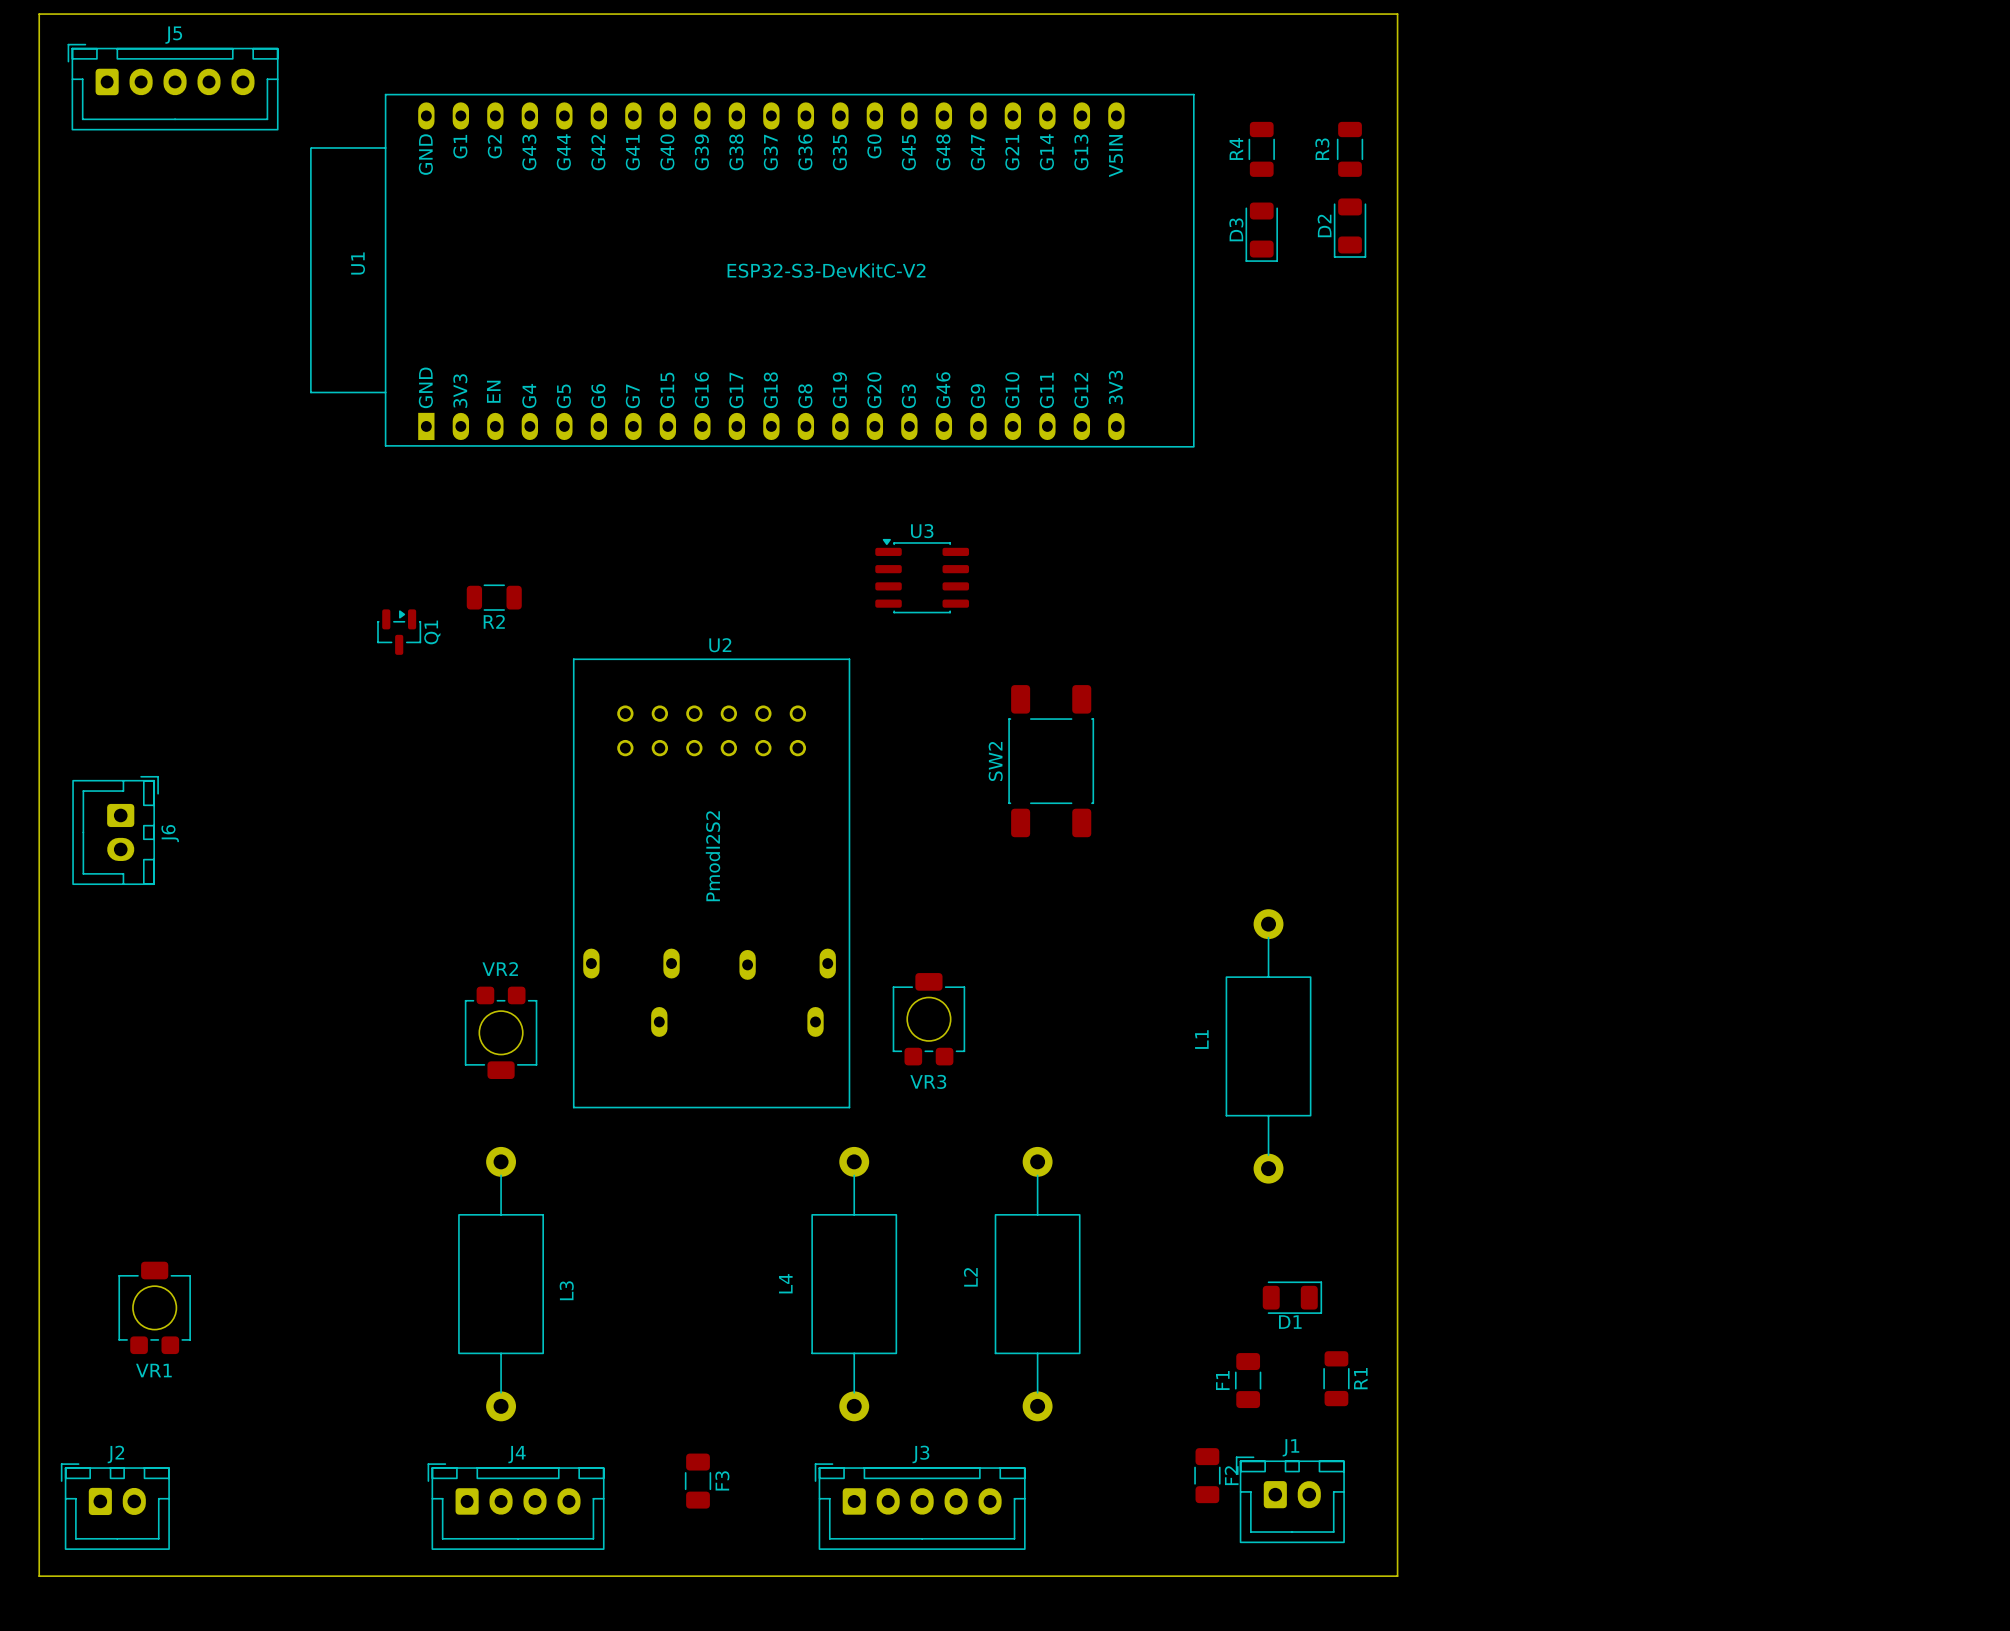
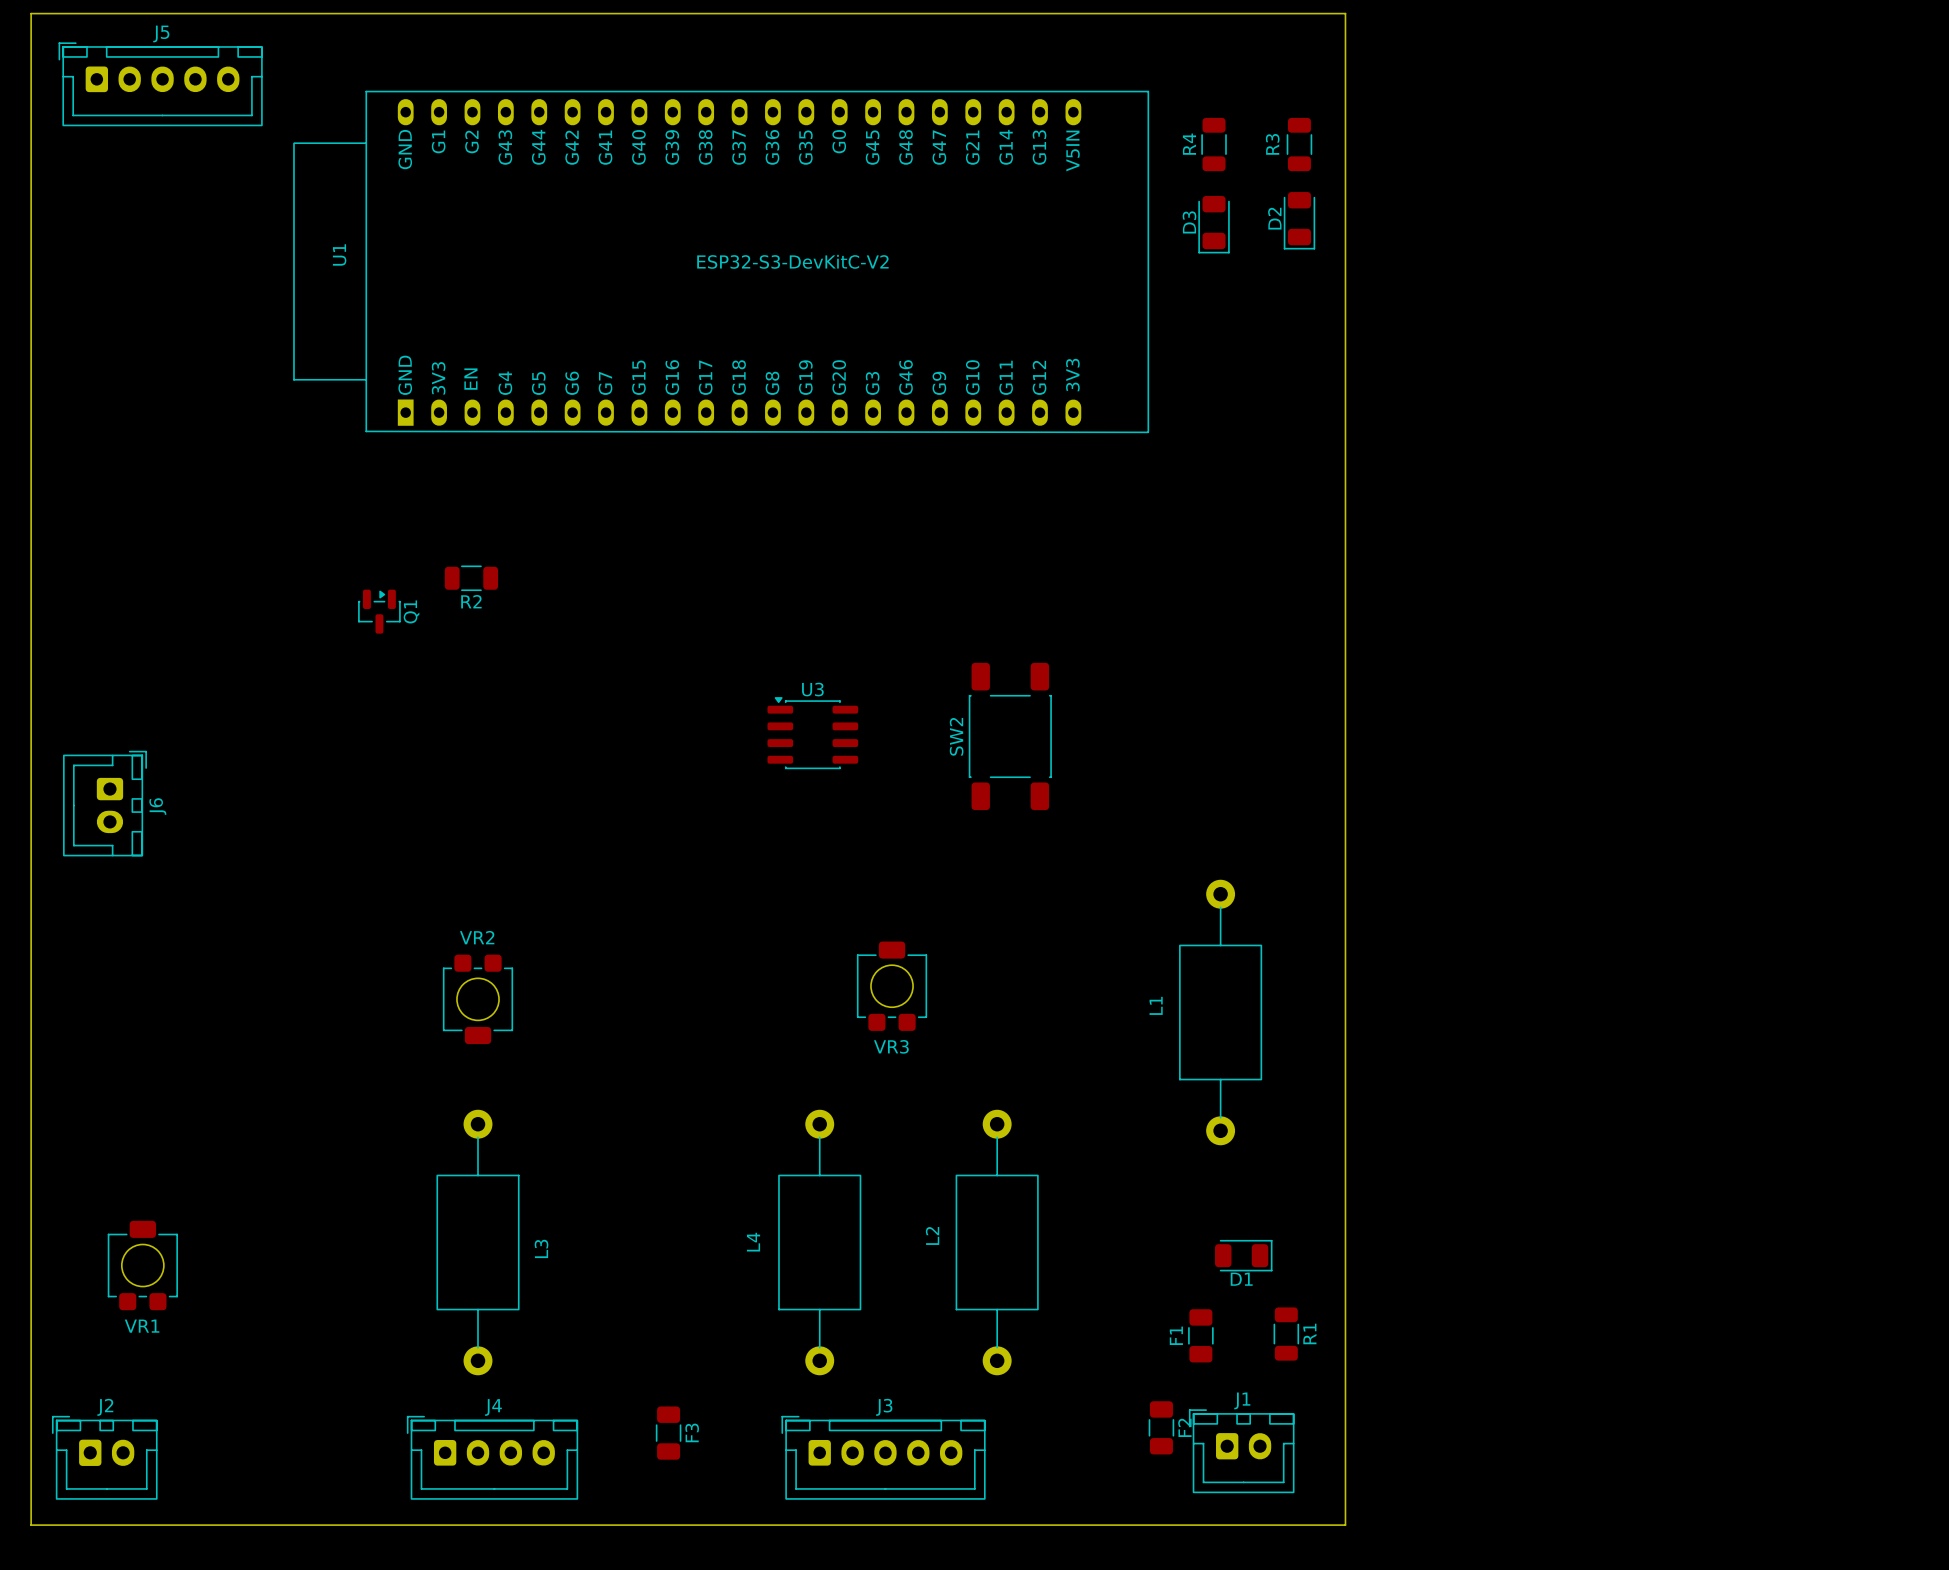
U3 position: (922, 576) -> (812, 733)
U2: PmodI2S2 (711, 883) -> none

